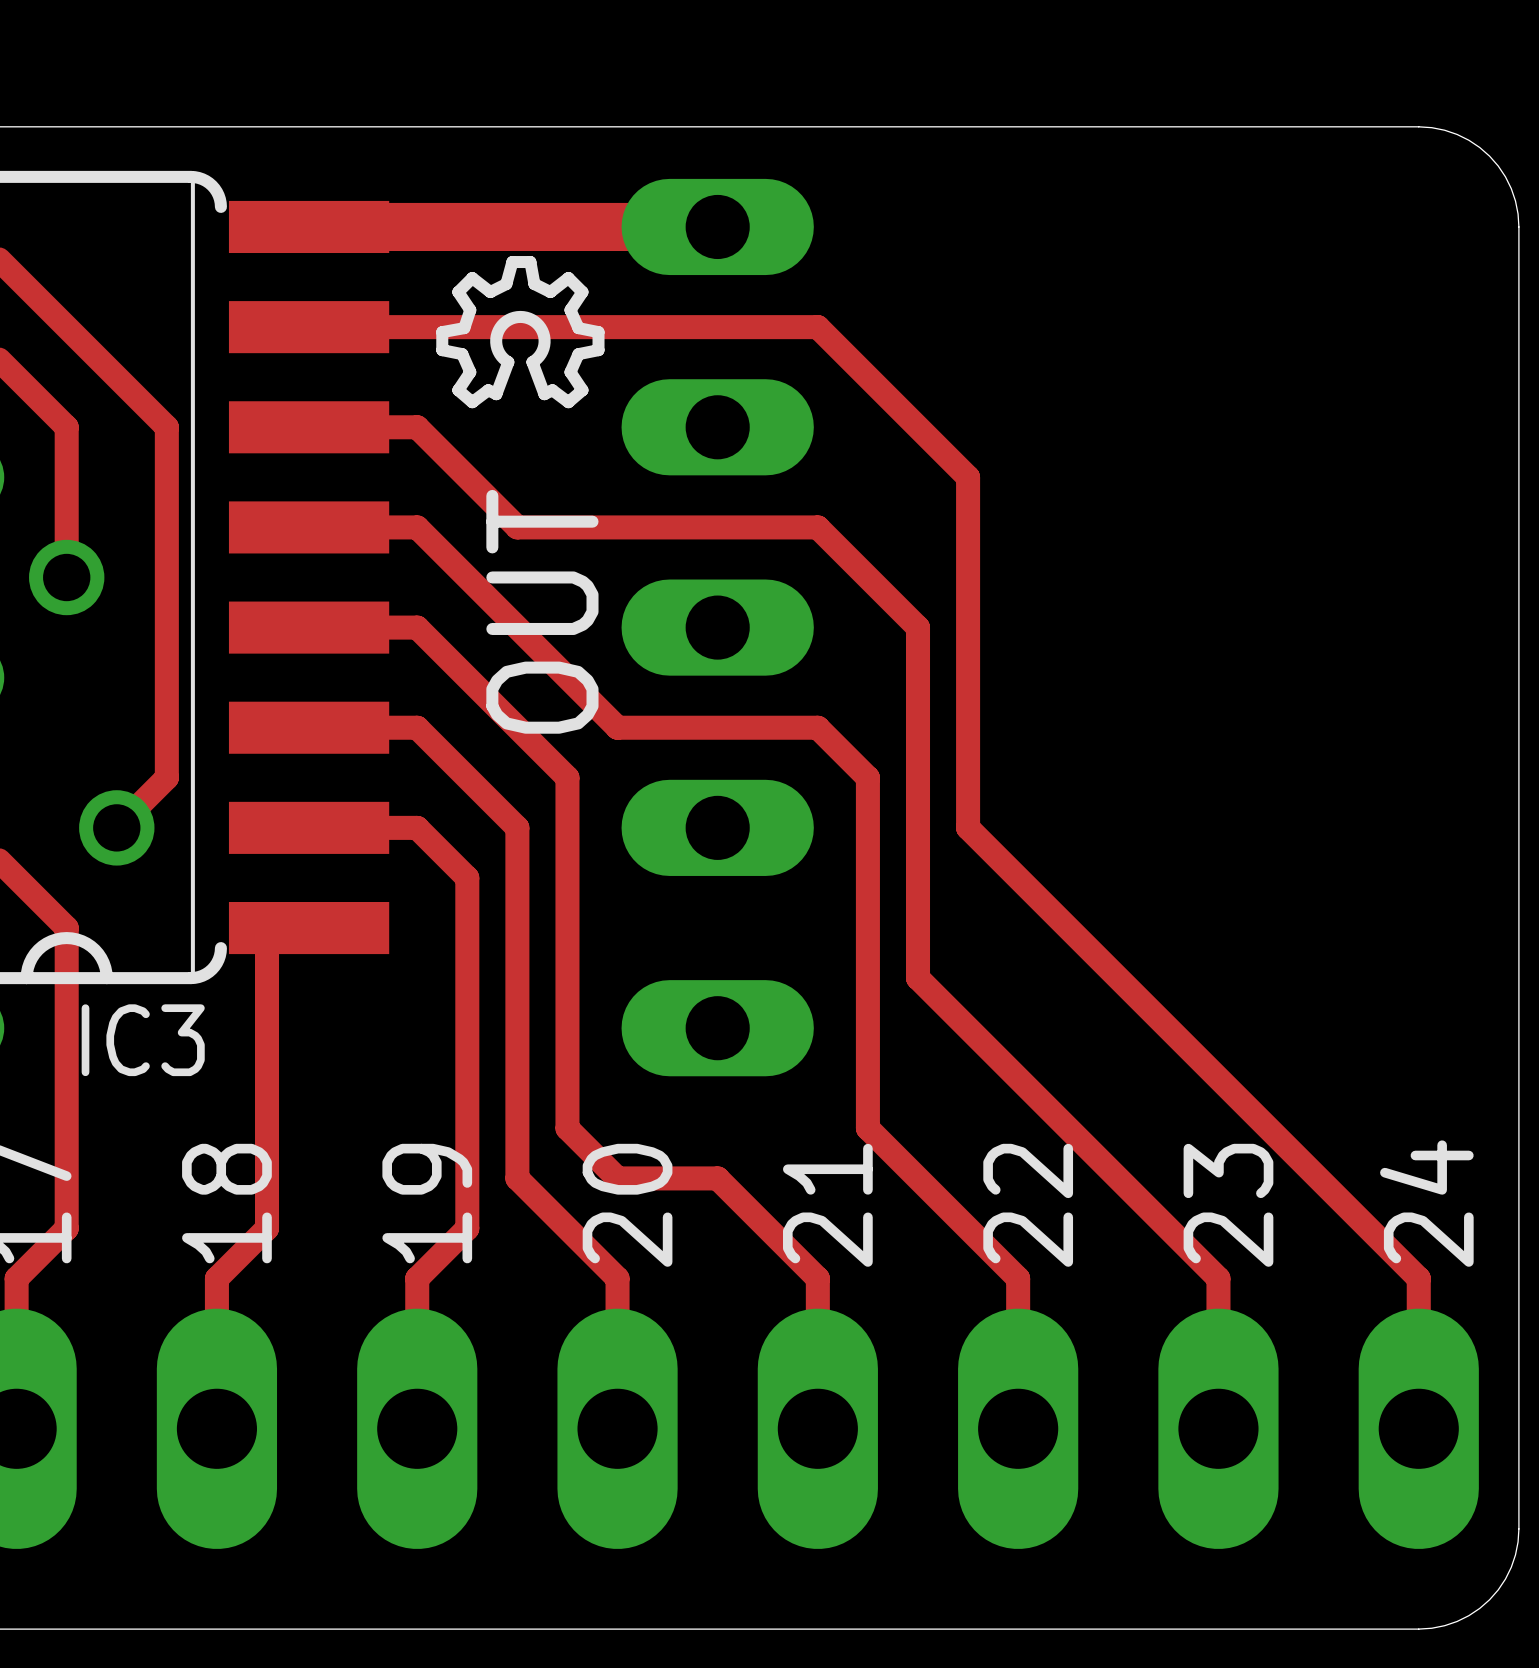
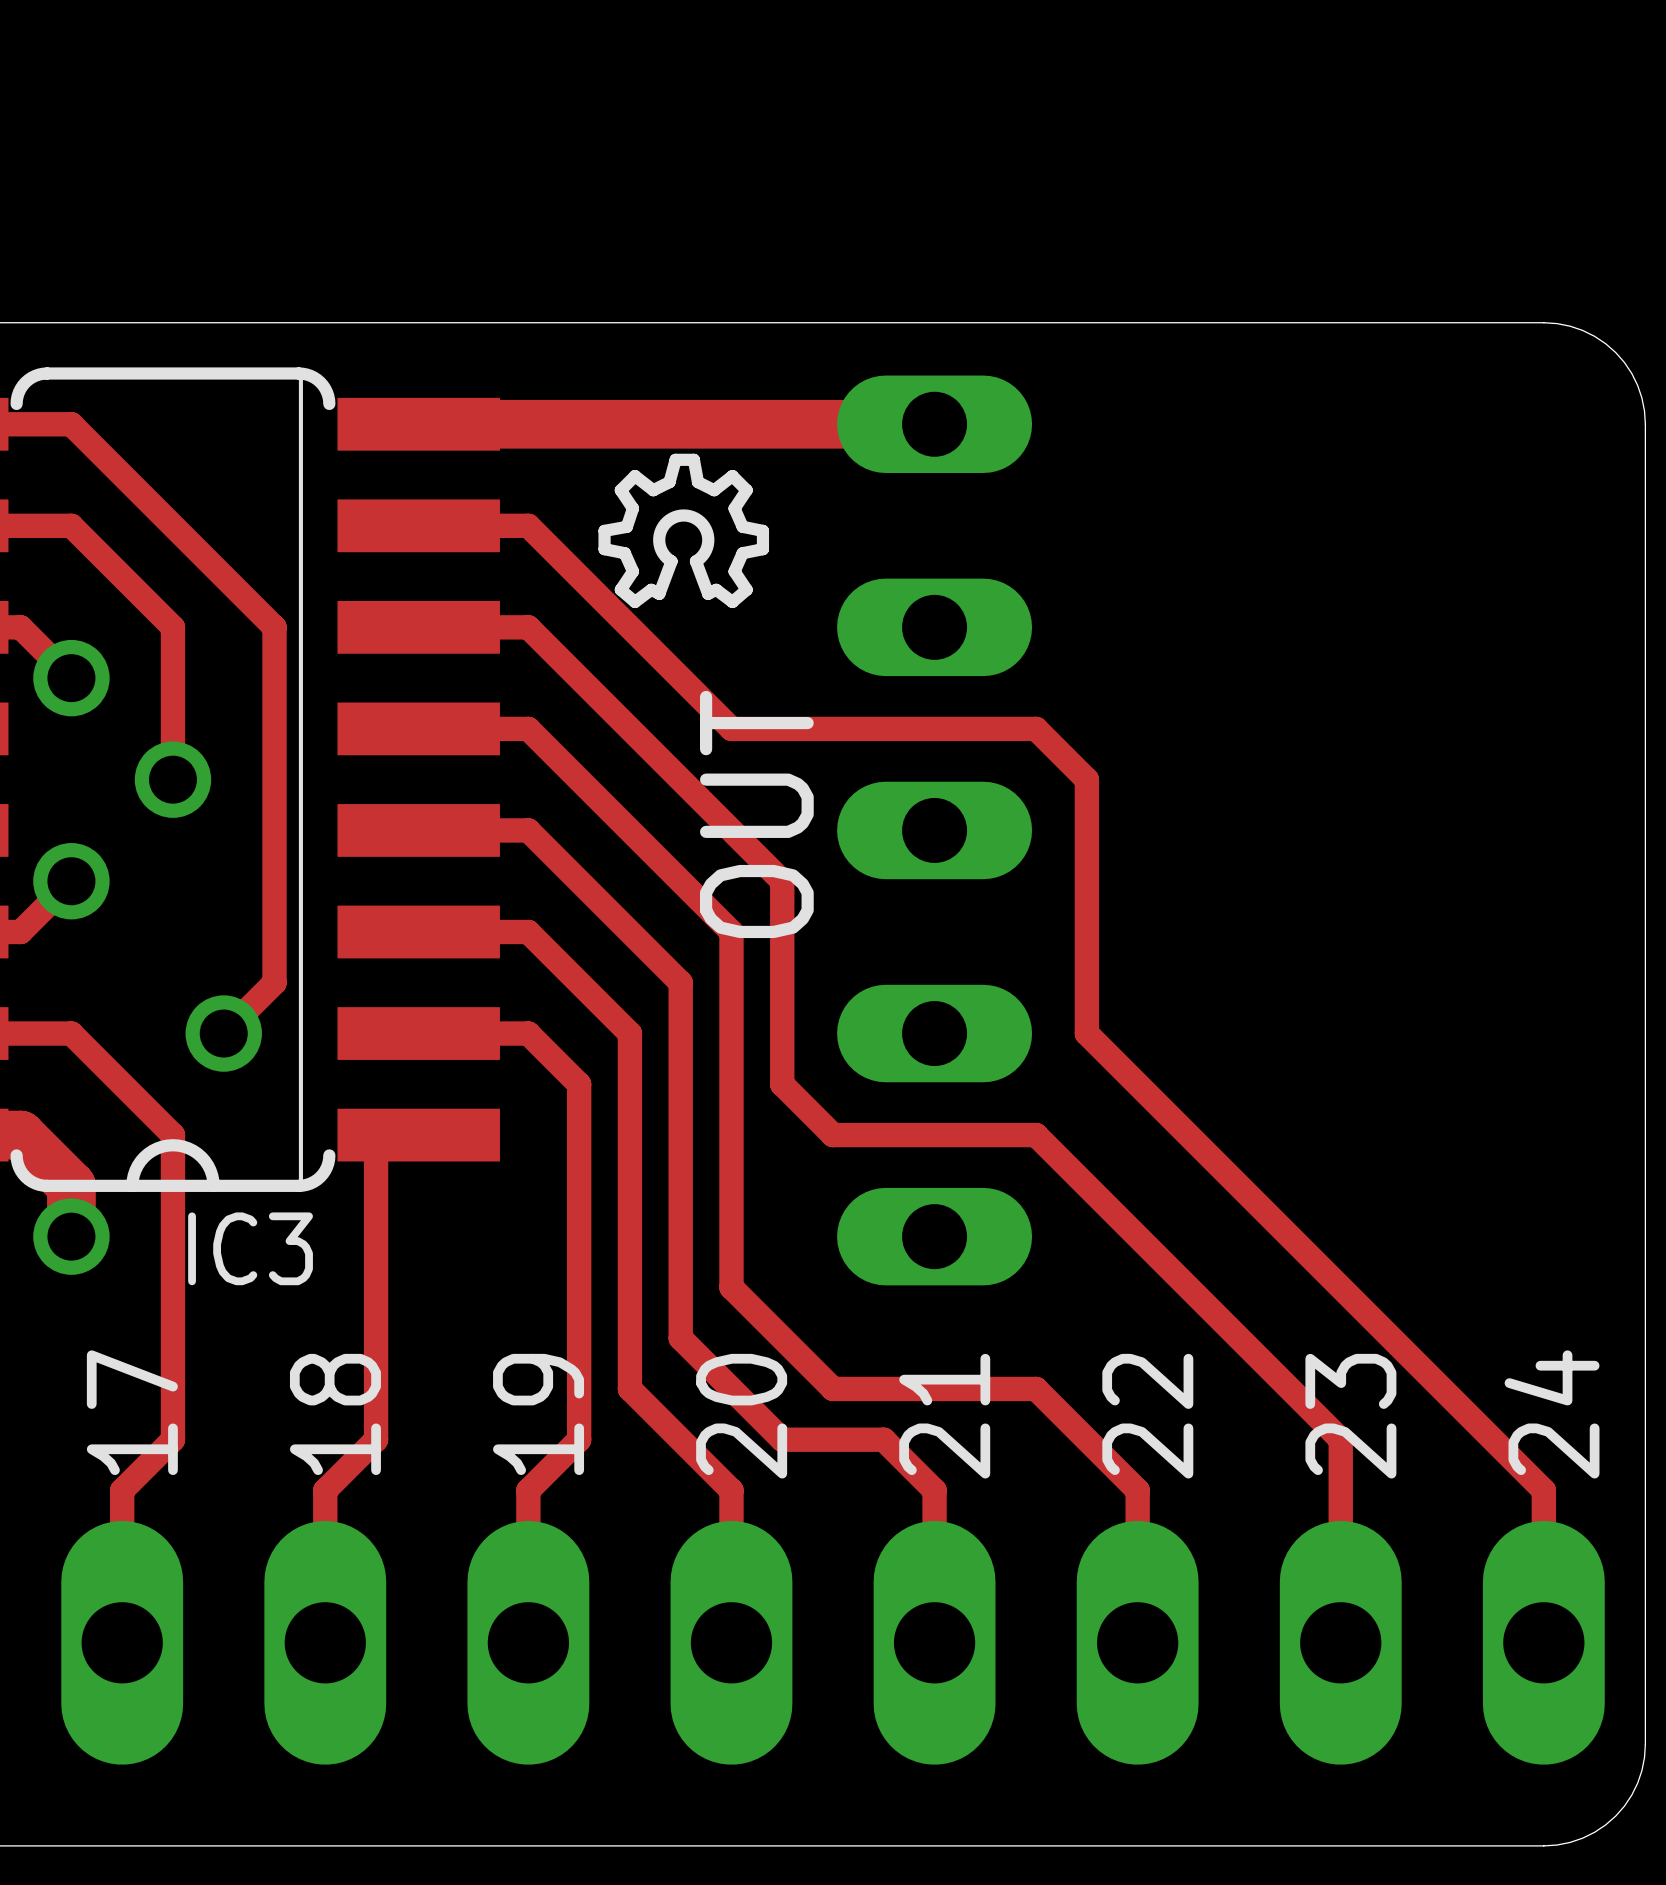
track: (417, 327) (817, 327) (968, 477) (968, 577) -> (934, 728) (1036, 728) (1086, 779)
drawing position: (520, 332) -> (683, 530)
track: (517, 527) (617, 527) -> (528, 525) (731, 728)
track: (817, 527) (918, 627) (918, 978) (1218, 1278) -> (629, 728) (782, 881) (782, 1084) (833, 1135) (1036, 1135) (1340, 1439) (1340, 1490)
OUT position: (717, 627) -> (934, 830)
track: (617, 727) (817, 727) (867, 777) (867, 1128) (918, 1178) -> (731, 932) (731, 1287) (833, 1388) (1036, 1388)
track: (617, 1178) (717, 1178) (767, 1228) -> (731, 1388) (782, 1439) (883, 1439)

